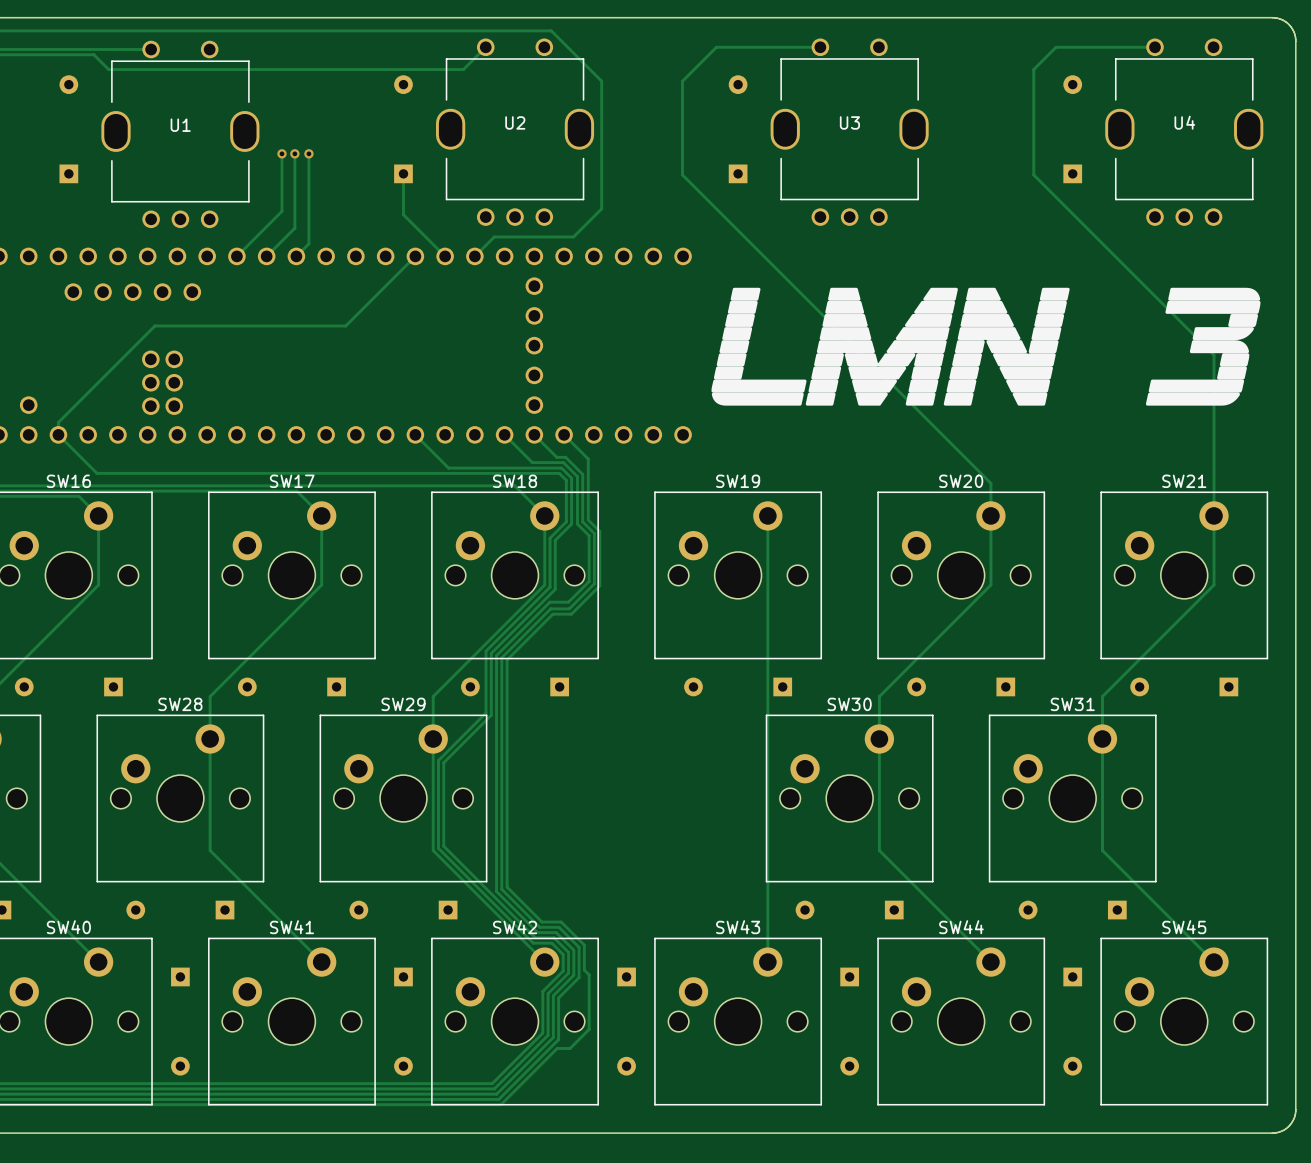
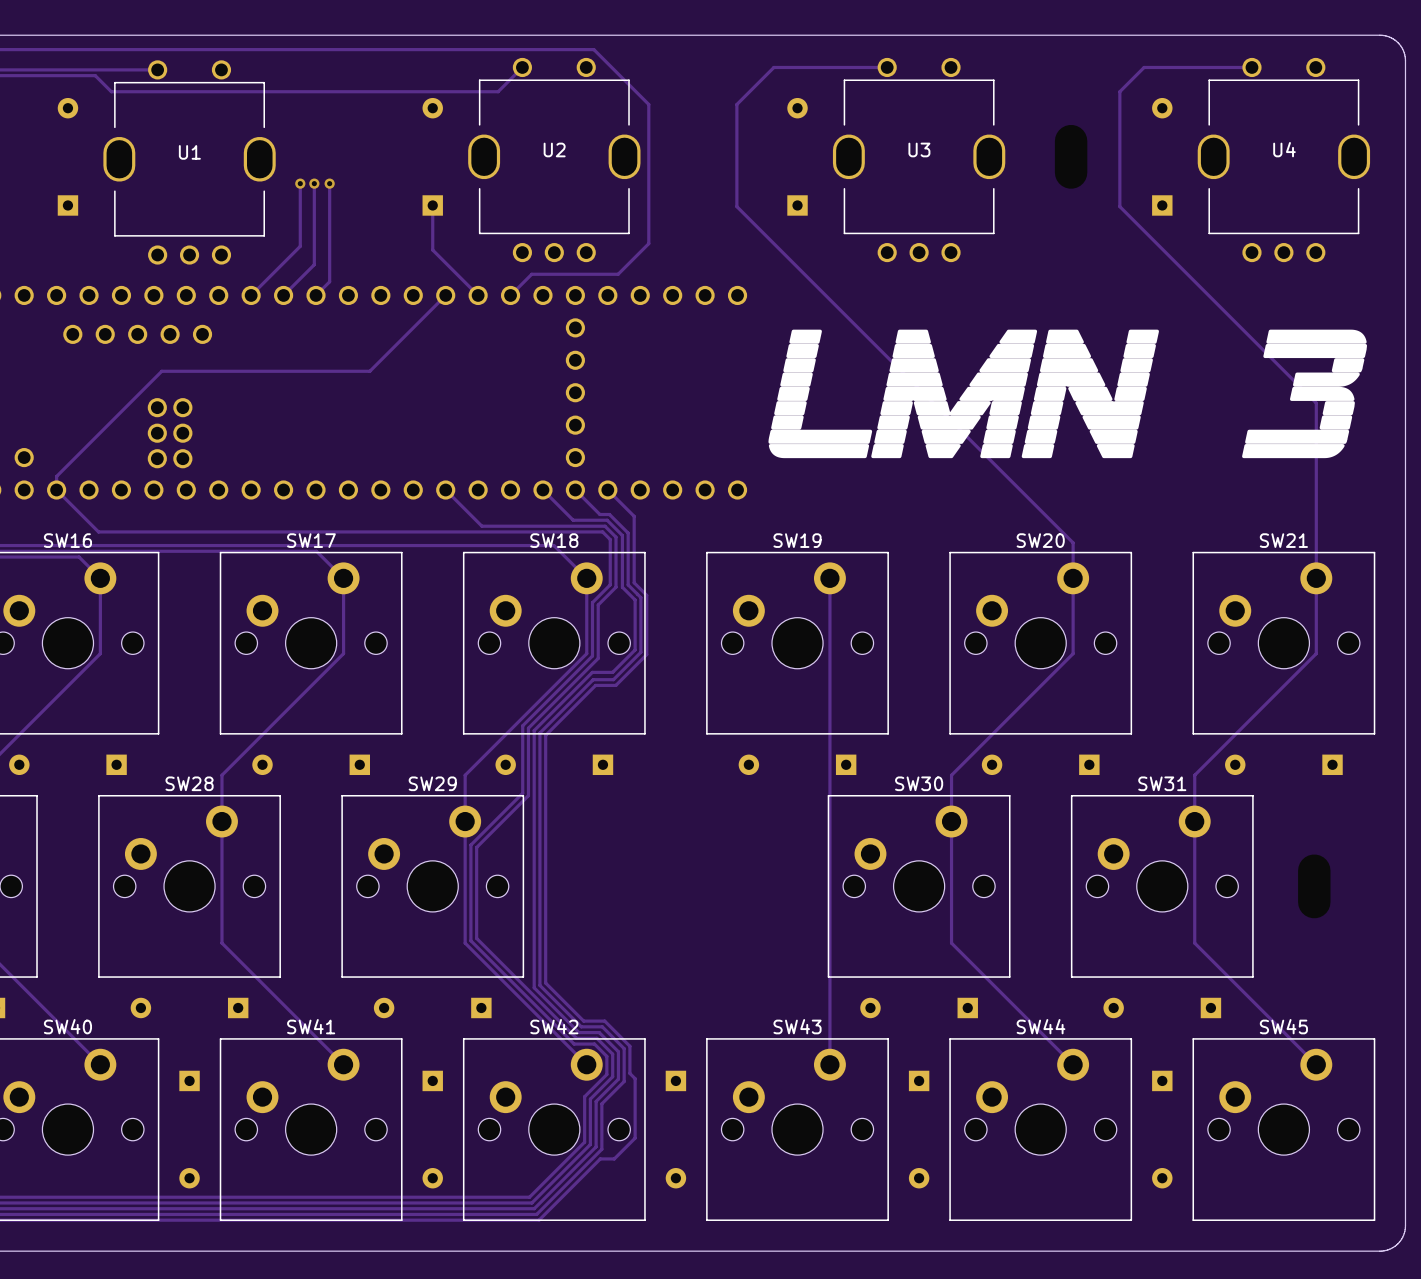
part: none -> (1071, 156)
part: none -> (1314, 886)

